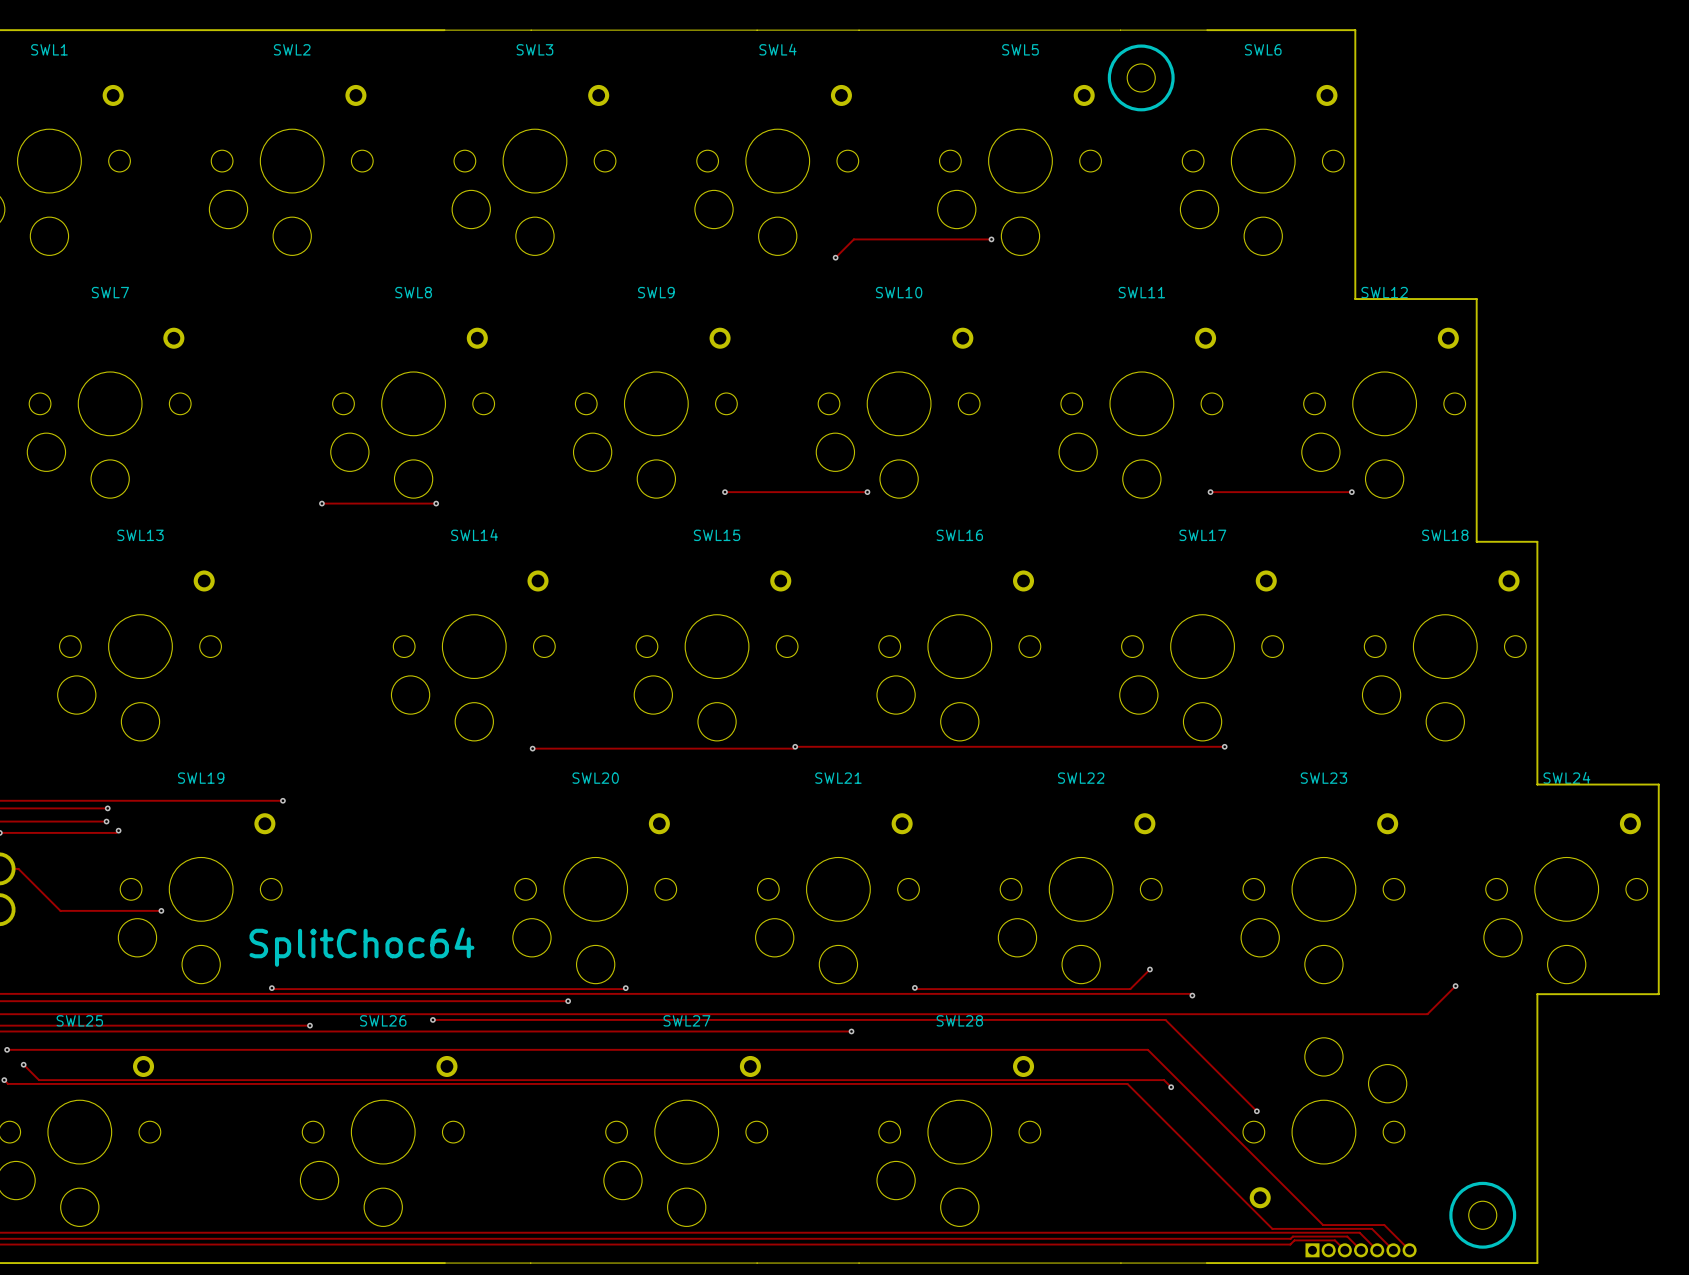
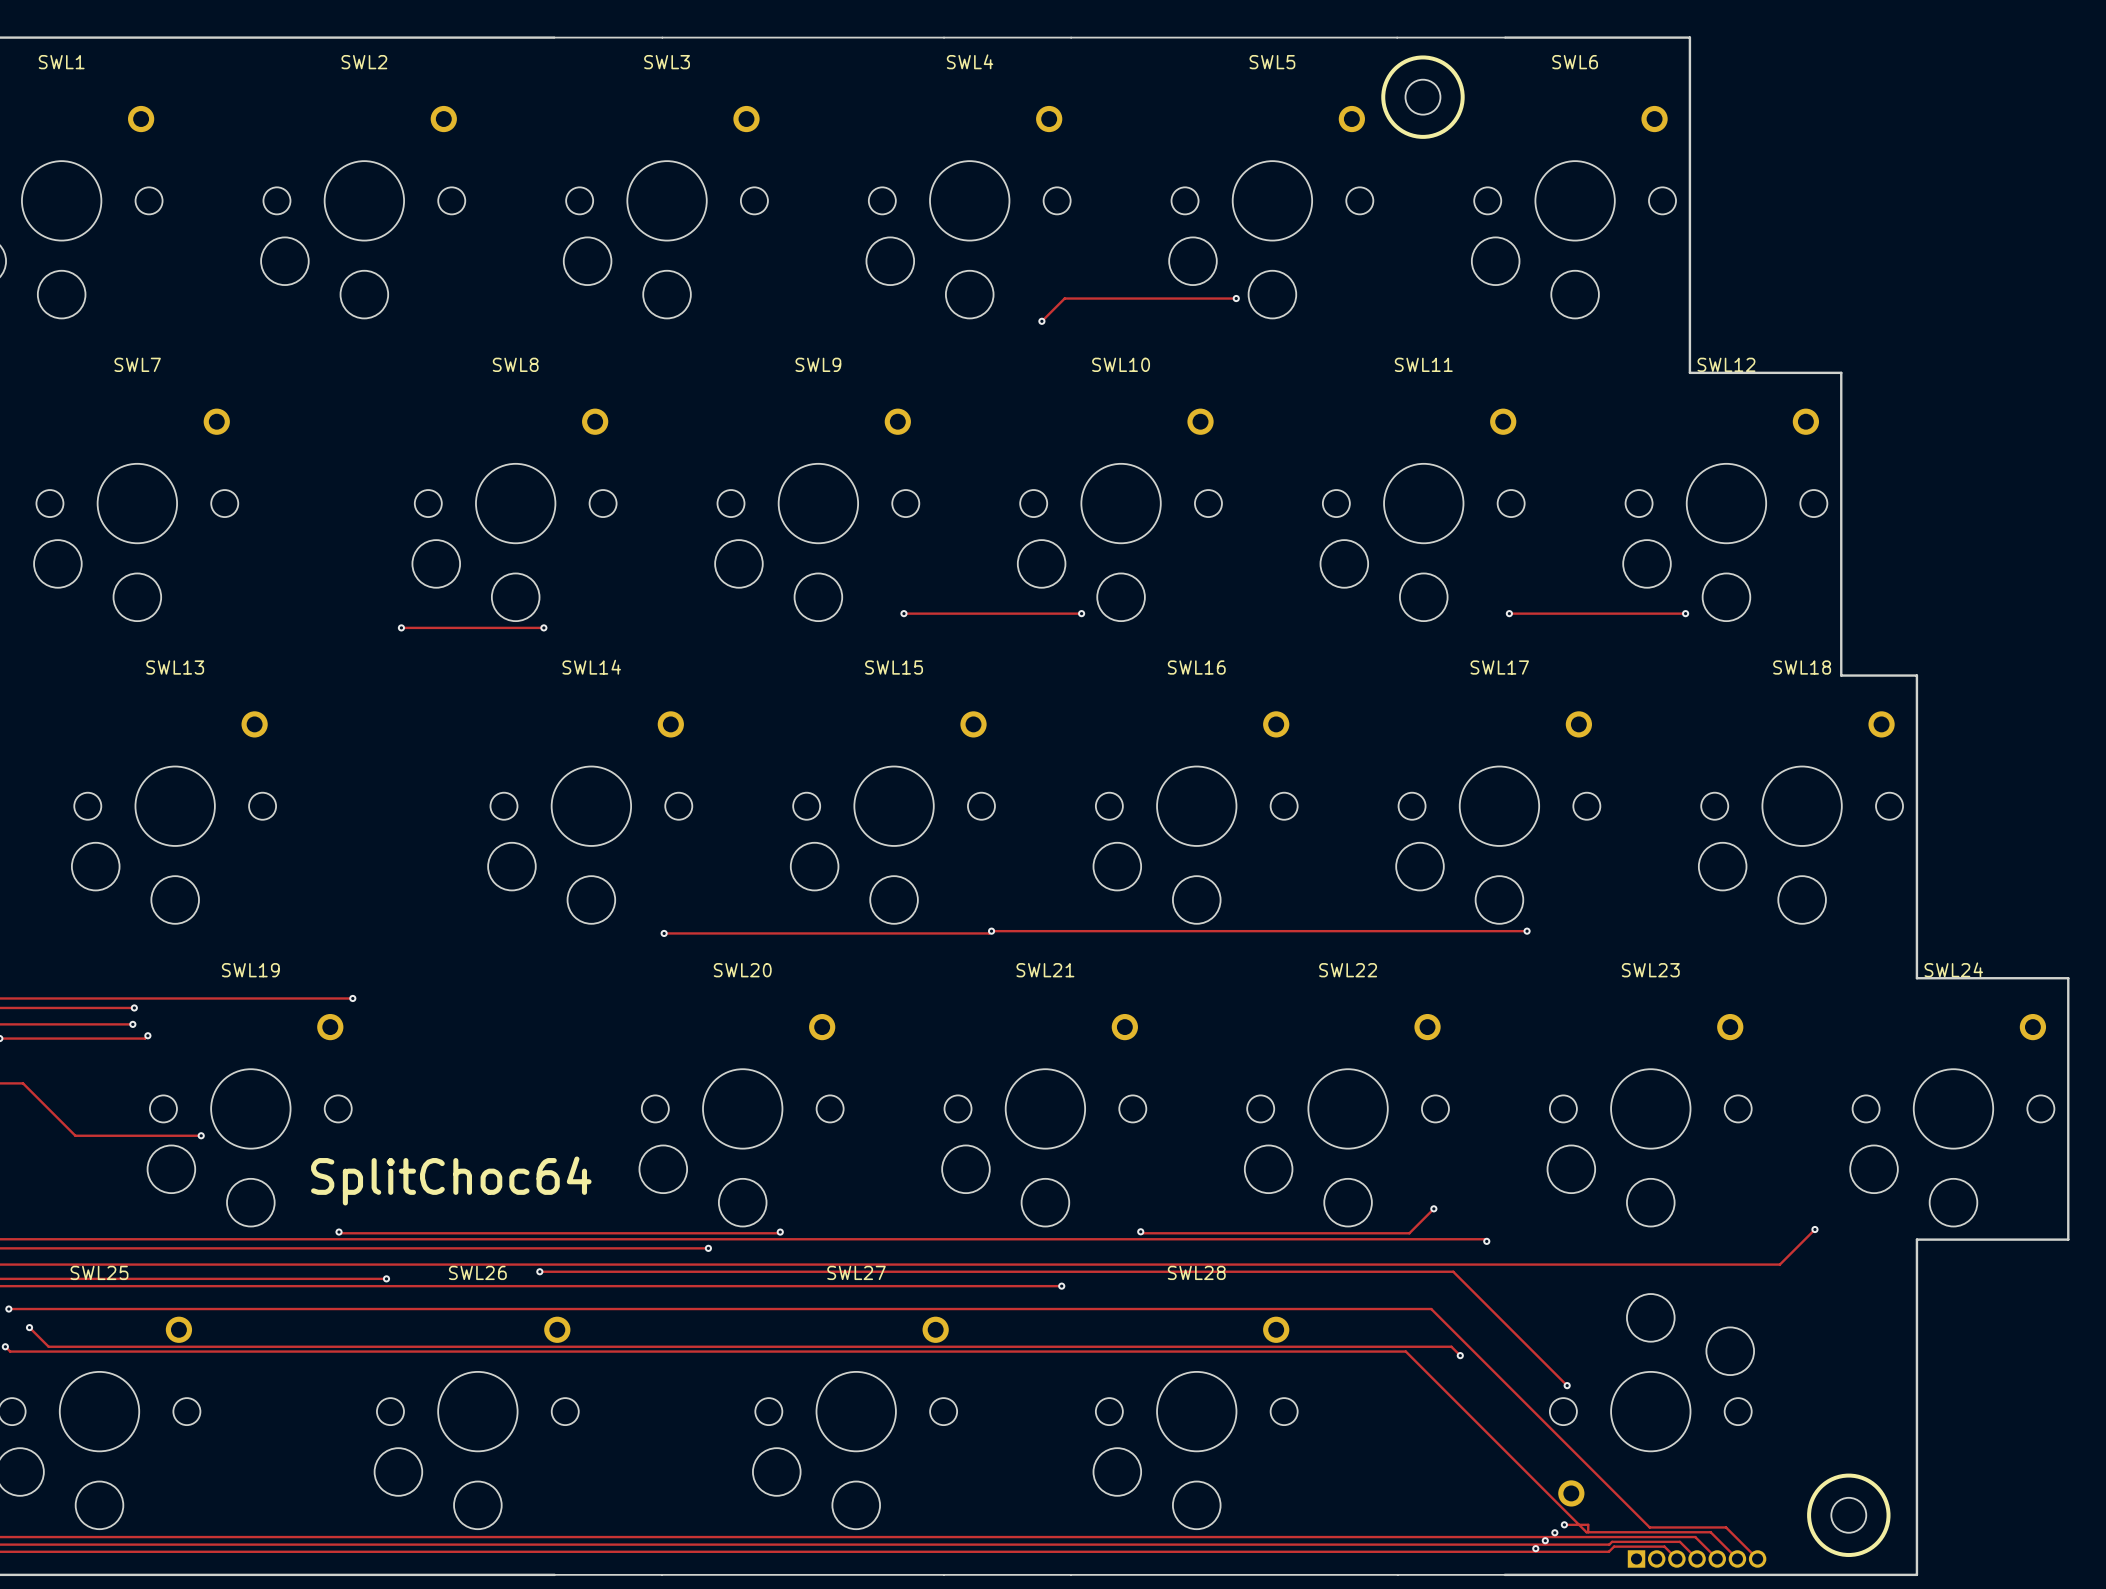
track: none -> (1564, 1524) (1588, 1524) (1588, 1532)
via: none -> (1564, 1524)
via: none -> (1554, 1532)
via: none -> (1545, 1540)
via: none -> (1535, 1548)

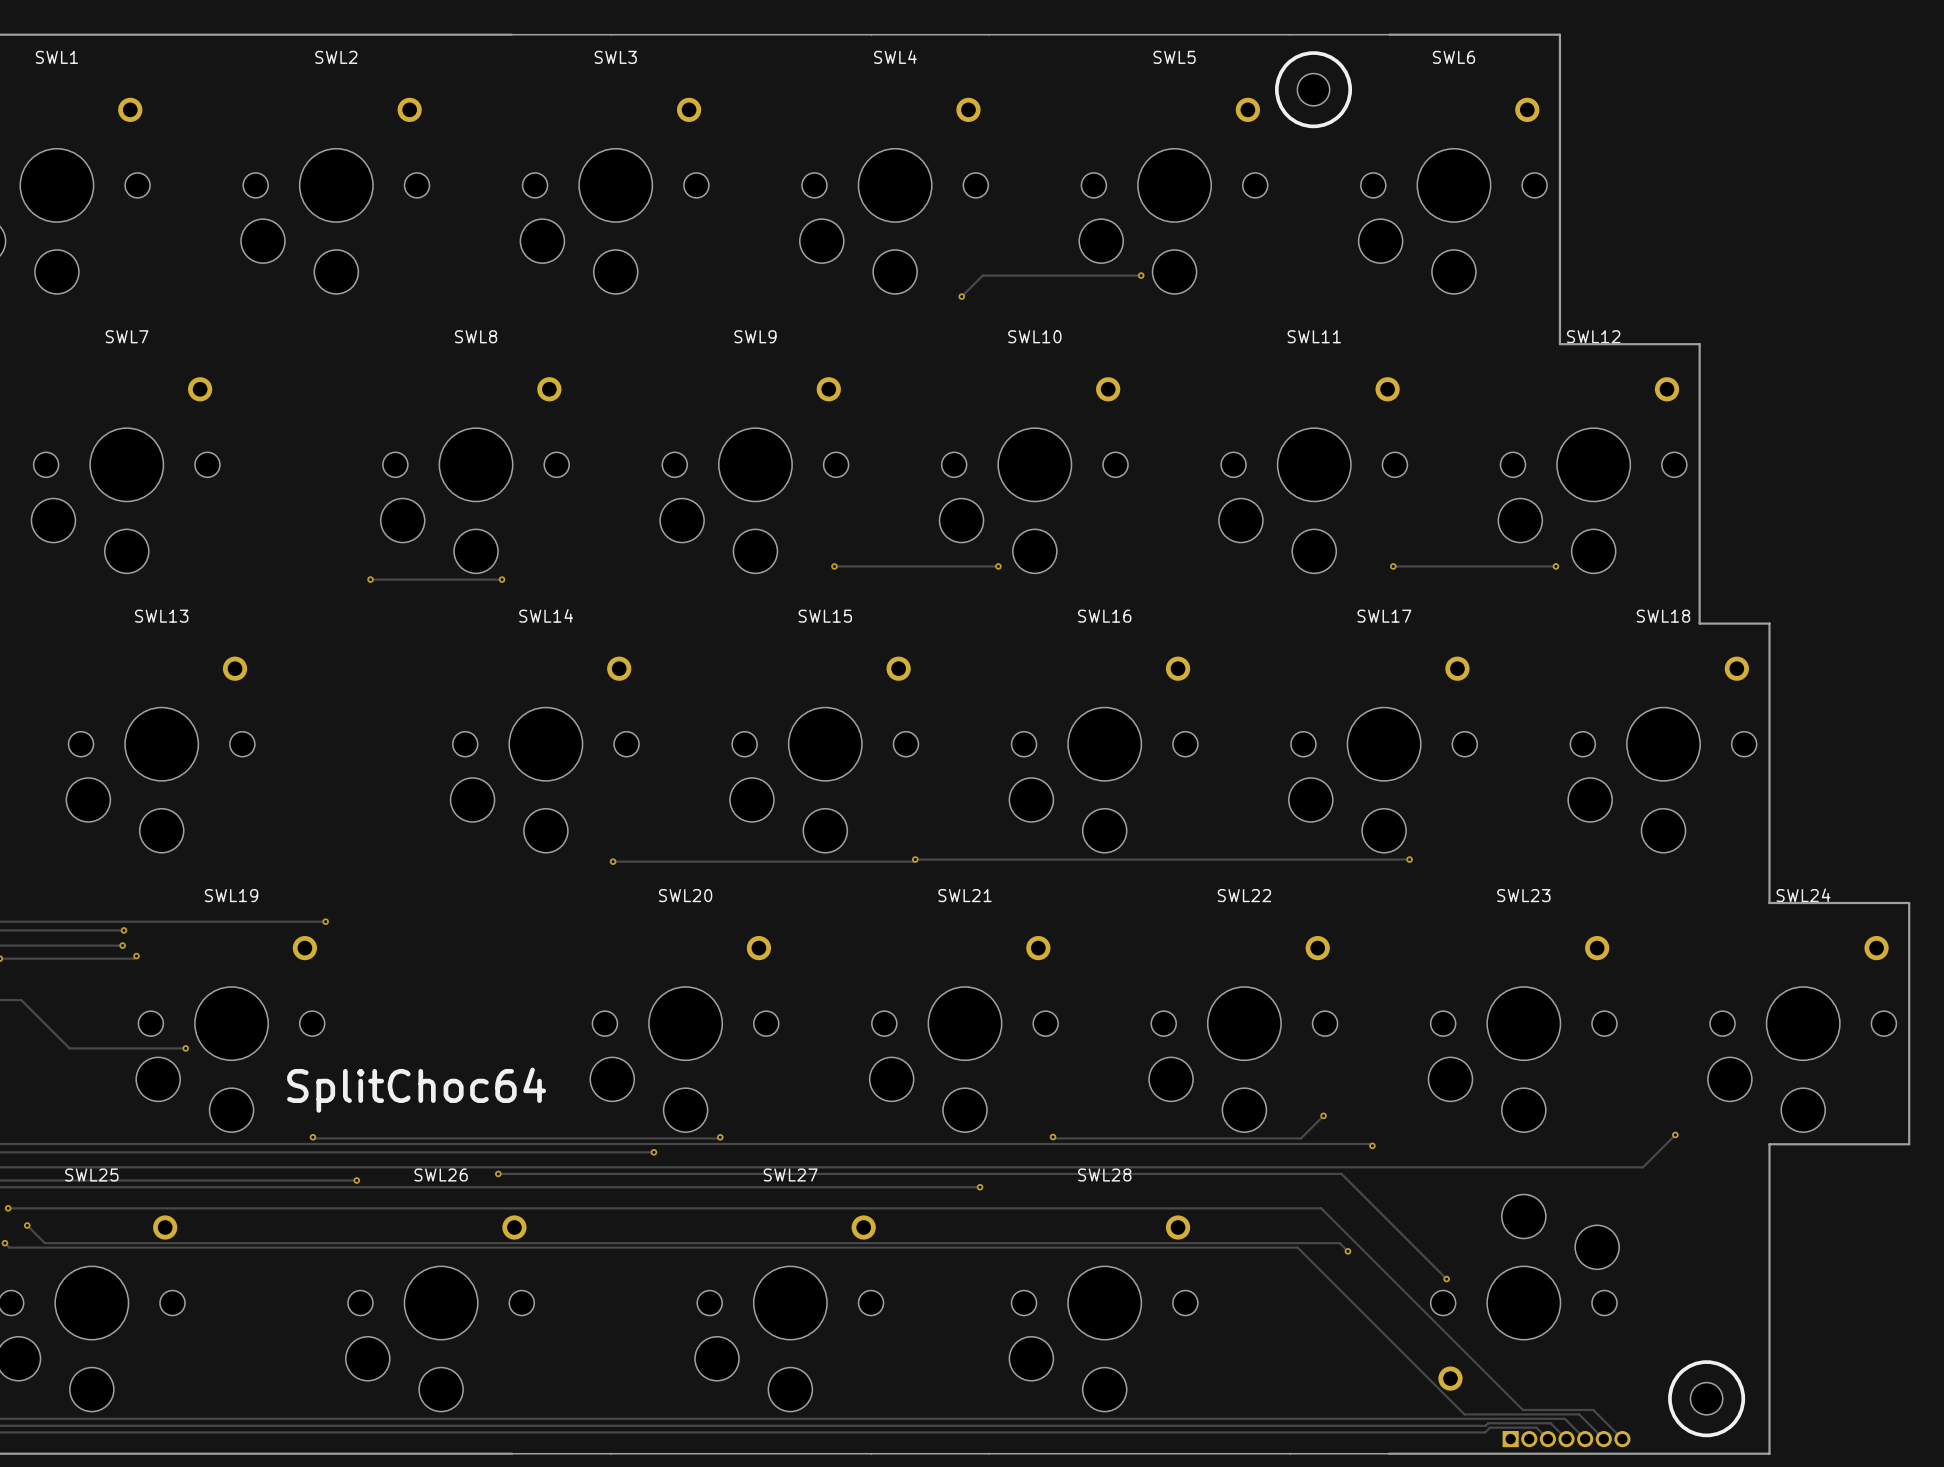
track: (1564, 1524) (1588, 1524) (1588, 1532) -> none
via: (1564, 1524) -> none
via: (1554, 1532) -> none
via: (1545, 1540) -> none
via: (1535, 1548) -> none

